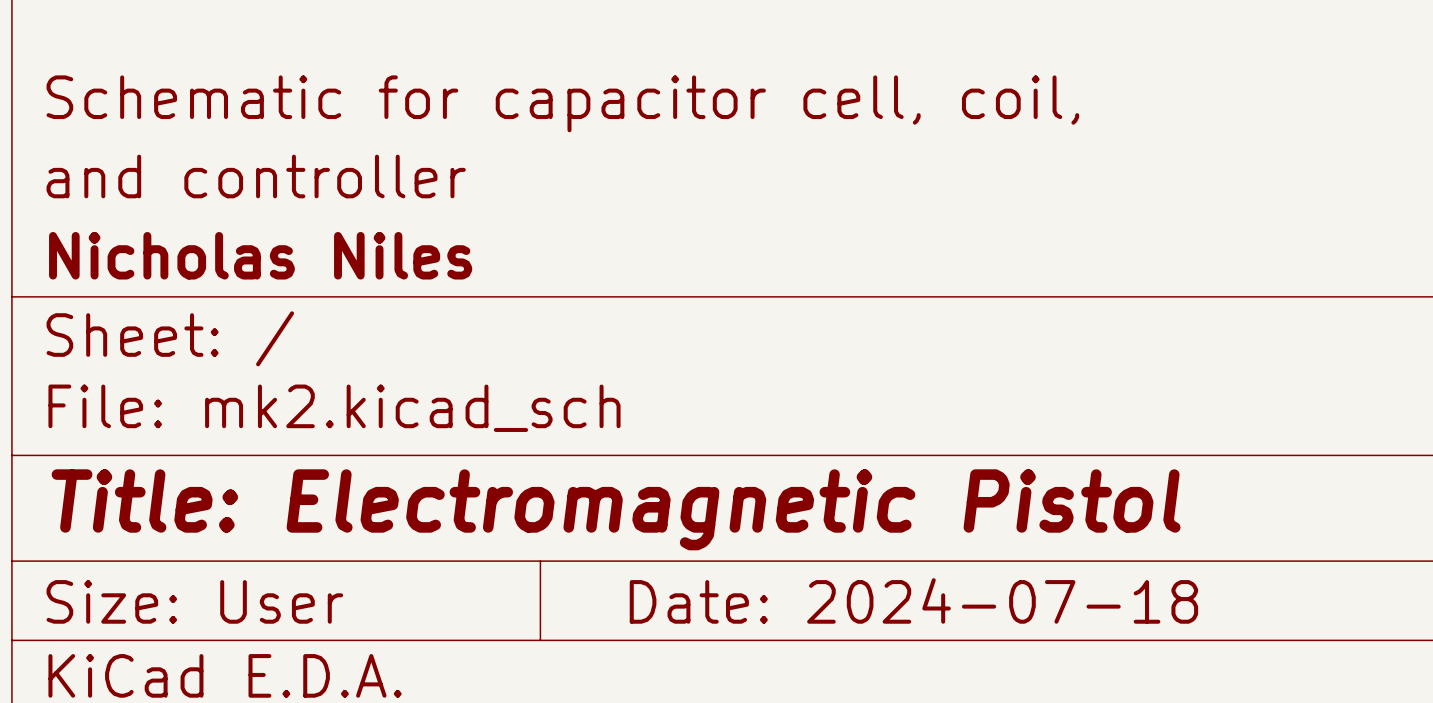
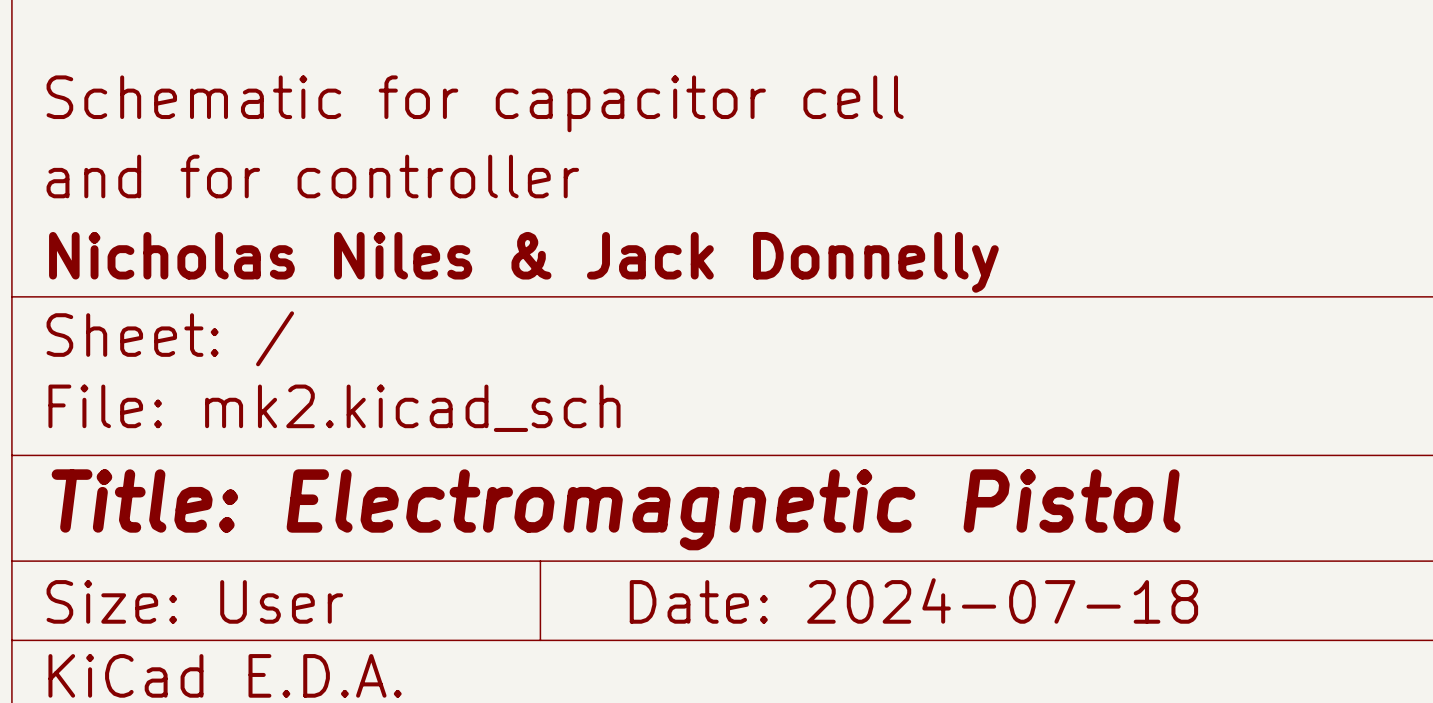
title block: Schematic for capacitor cell, coil, (562, 103) -> Schematic for capacitor cell (475, 103)
title block: and controller (256, 176) -> and for controller (312, 176)
title block: Nicholas Niles (260, 255) -> Nicholas Niles & Jack Donnelly (523, 262)

